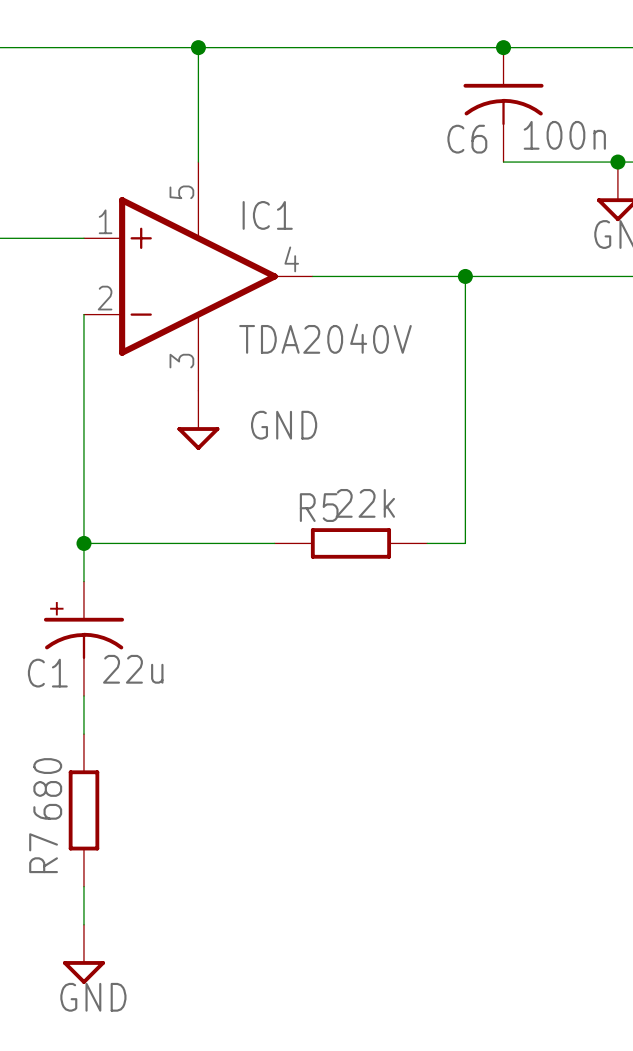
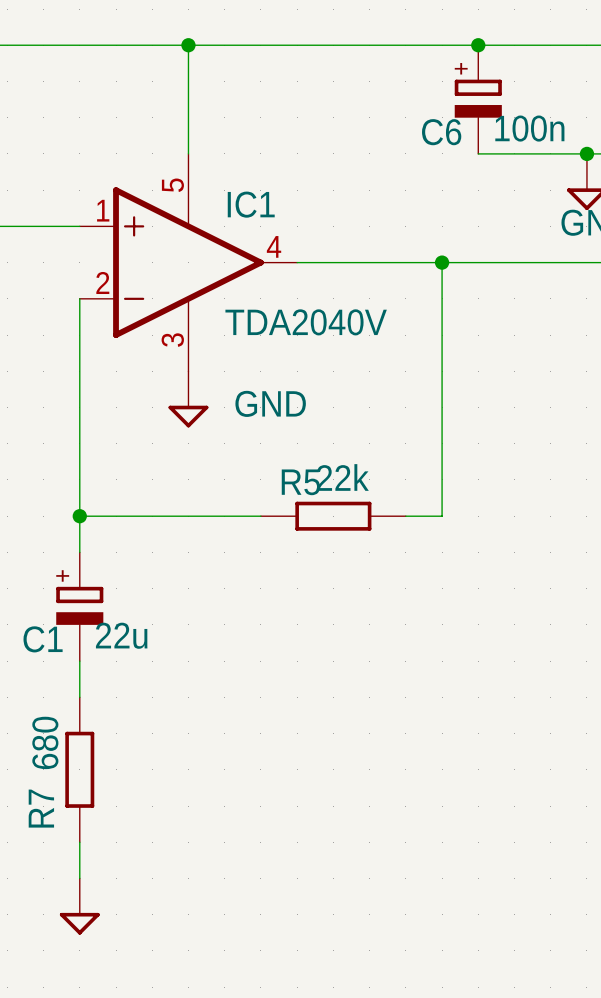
C6 symbol: [463, 47, 544, 163] -> [454, 45, 502, 154]
C1 symbol: [43, 581, 125, 696] -> [56, 552, 104, 662]
power symbol text: GND (93, 997) -> none

